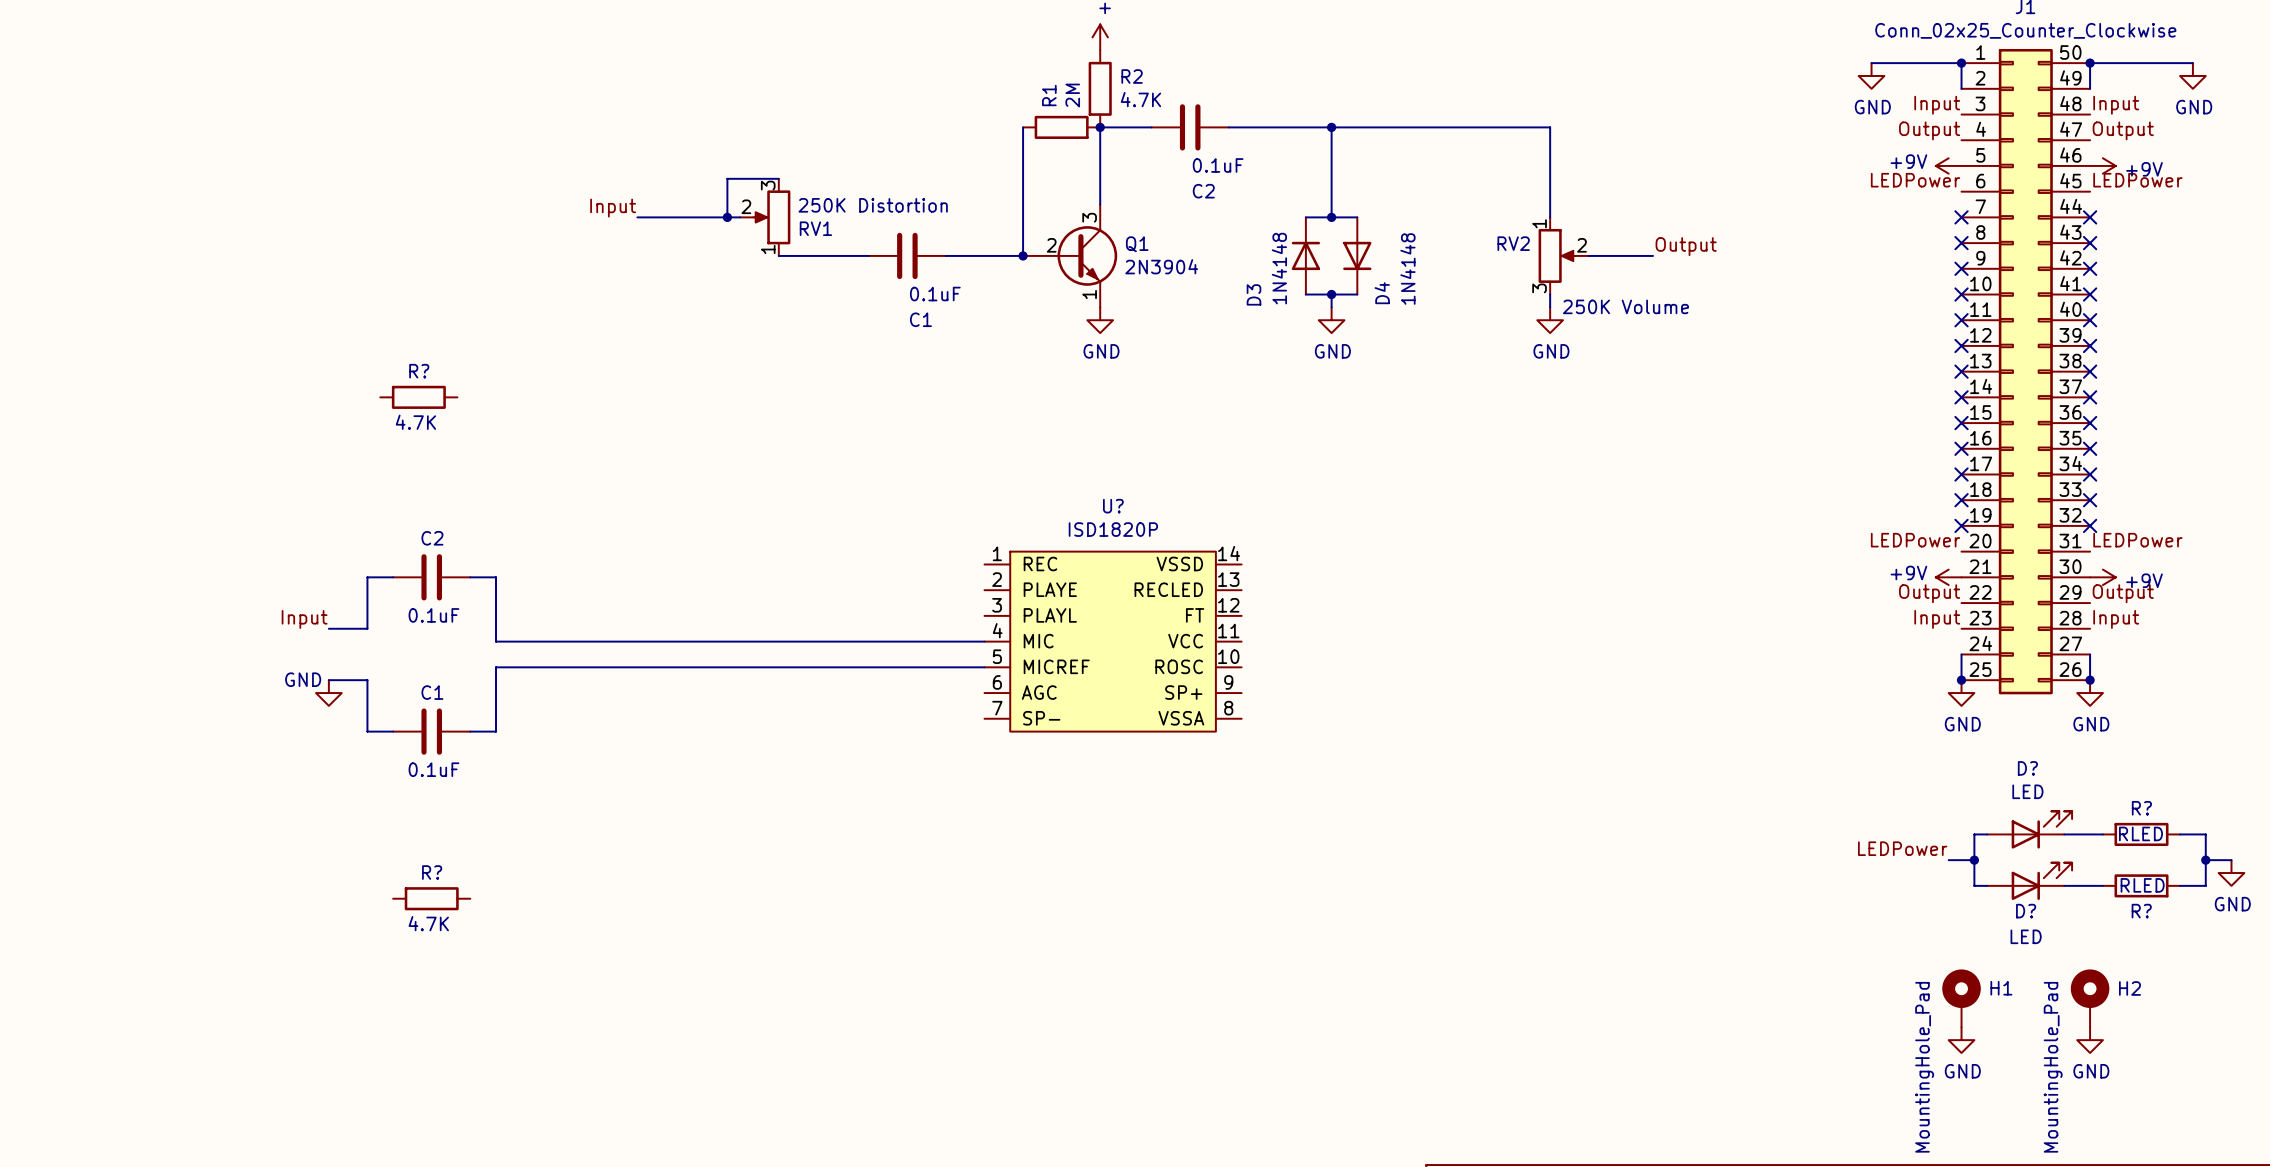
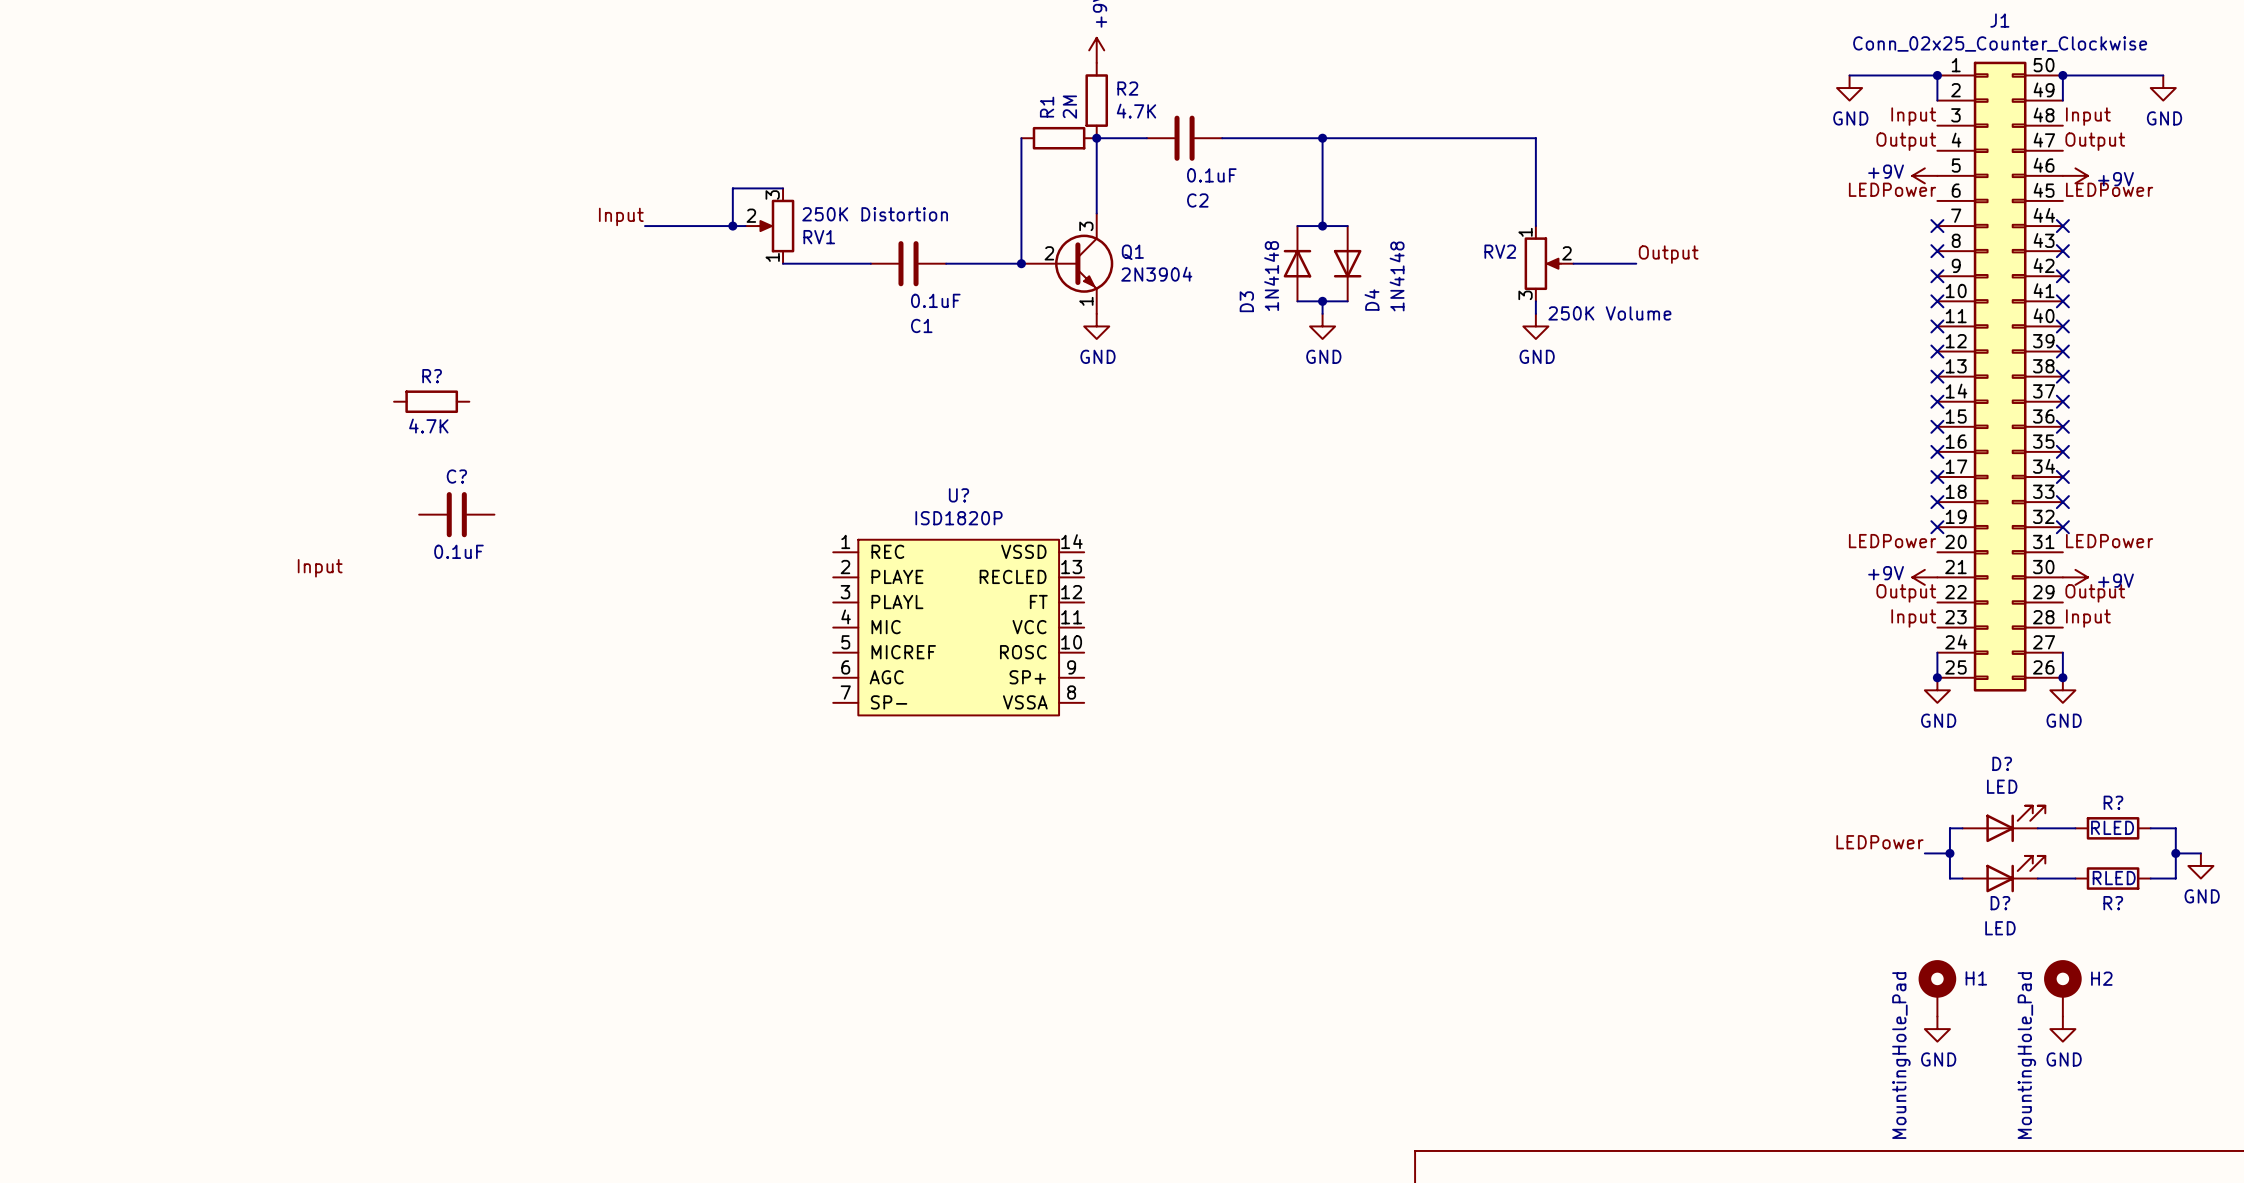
C?: none -> 0.1uF (456, 514)
wire: (393, 577) (367, 577) (367, 628) (328, 628) -> none
C2: 0.1uF (431, 577) -> none
wire: (470, 577) (496, 577) (496, 641) (984, 641) -> none
label position: Input (304, 619) -> Input (320, 568)
U? position: (1113, 641) -> (958, 627)
wire: (984, 667) (496, 667) (496, 731) (470, 731) -> none
wire: (328, 680) (367, 680) (367, 731) (393, 731) -> none
power symbol: GND (328, 693) -> none
C1: 0.1uF (431, 731) -> none
R?: 4.7K (431, 898) -> none

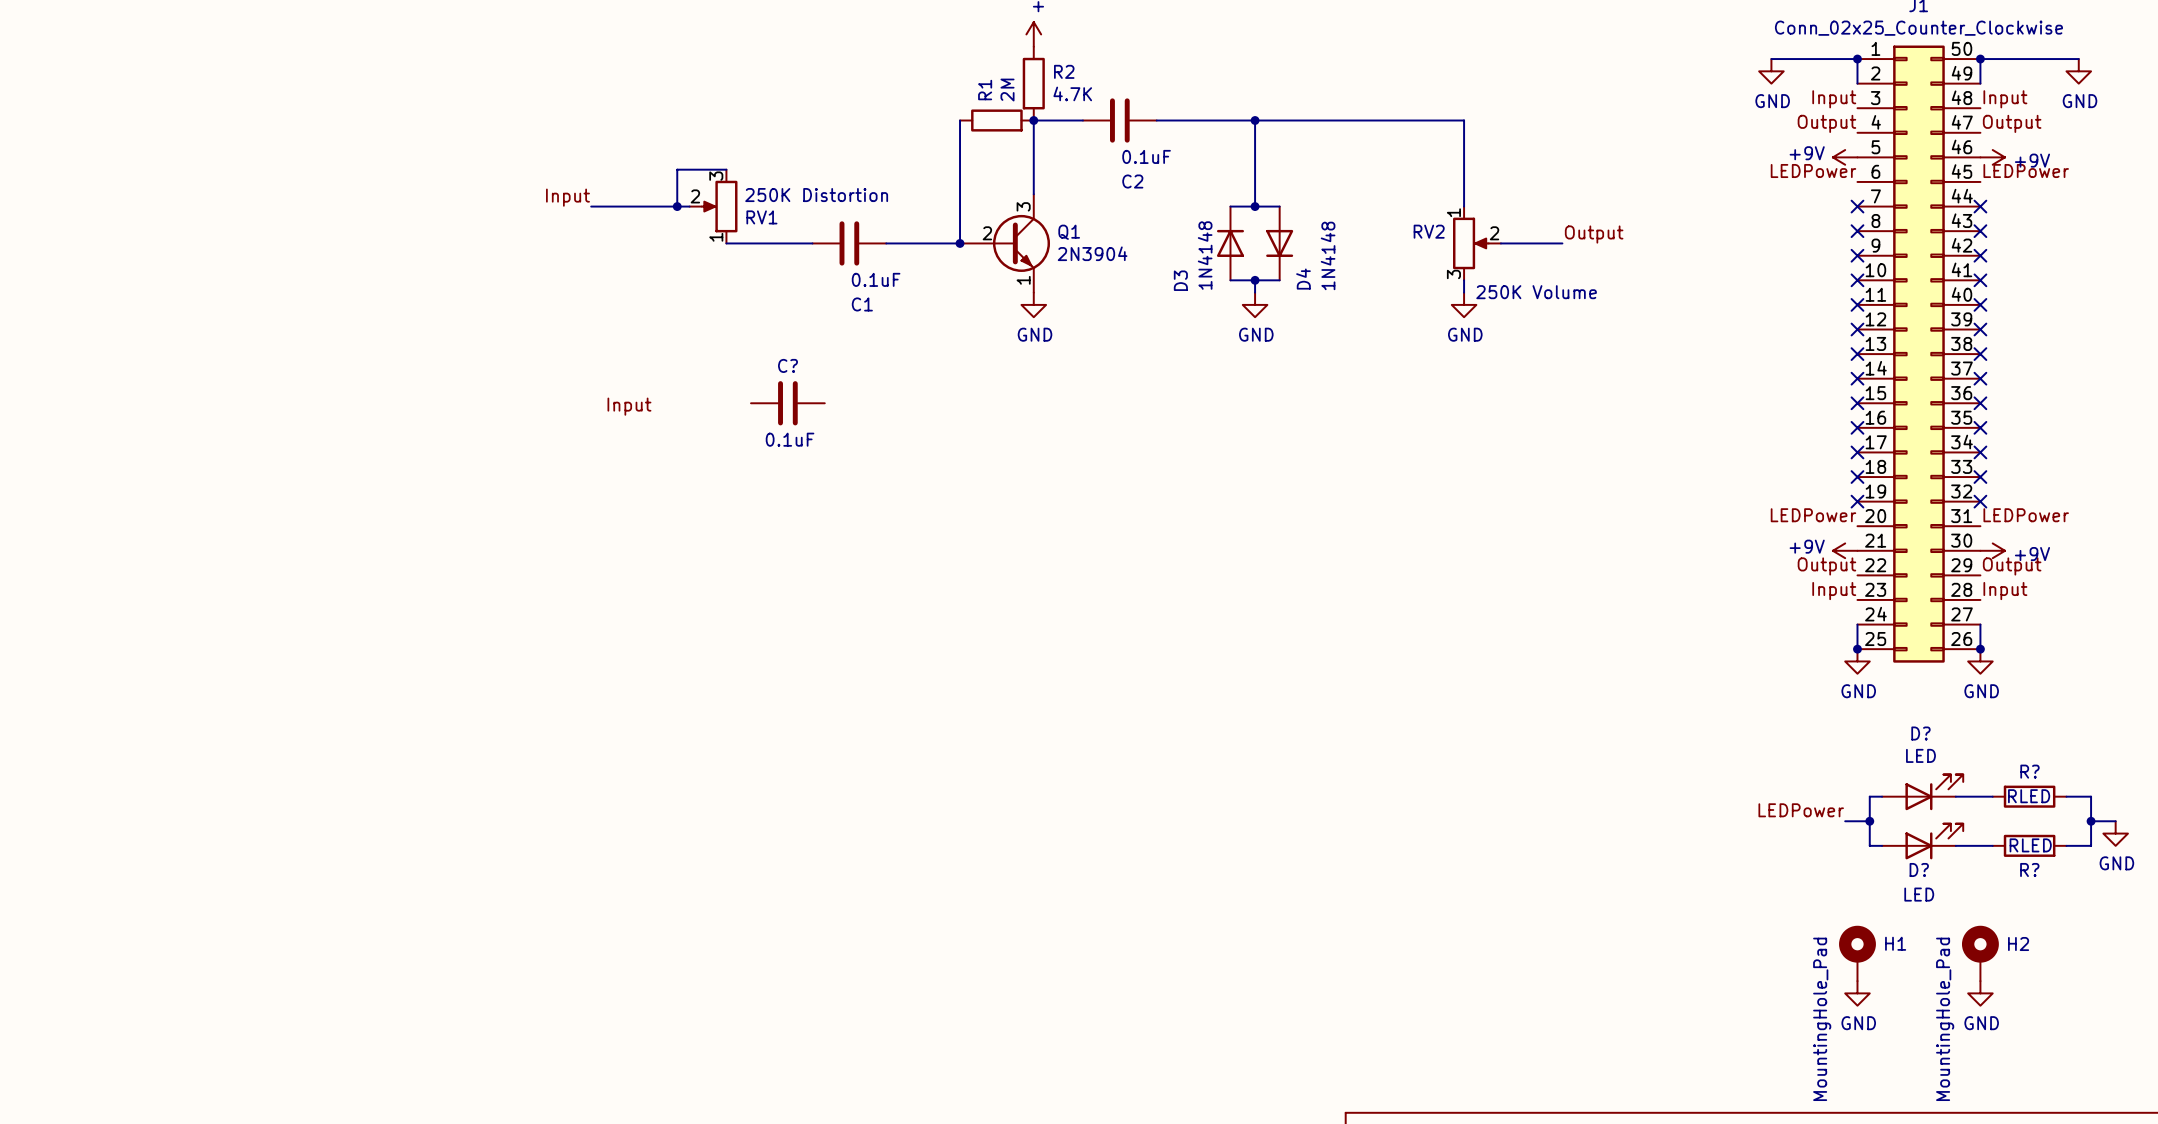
R?: 4.7K (431, 401) -> none
C?: none -> 0.1uF (787, 403)
label: none -> Input (629, 406)
C?: 0.1uF (456, 514) -> none
label: Input (320, 568) -> none
U?: ISD1820P (958, 627) -> none

